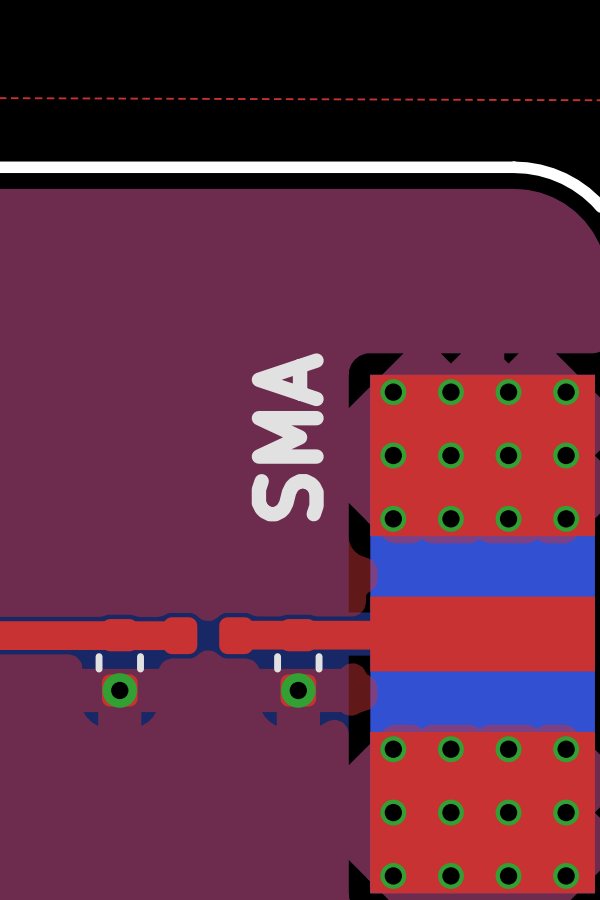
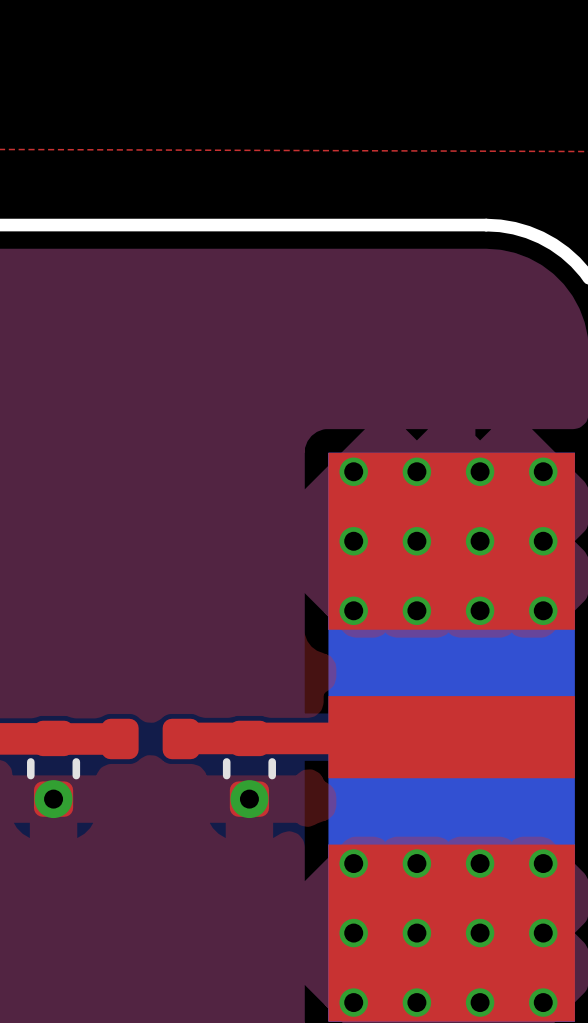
text: SMA (287, 437) -> none

